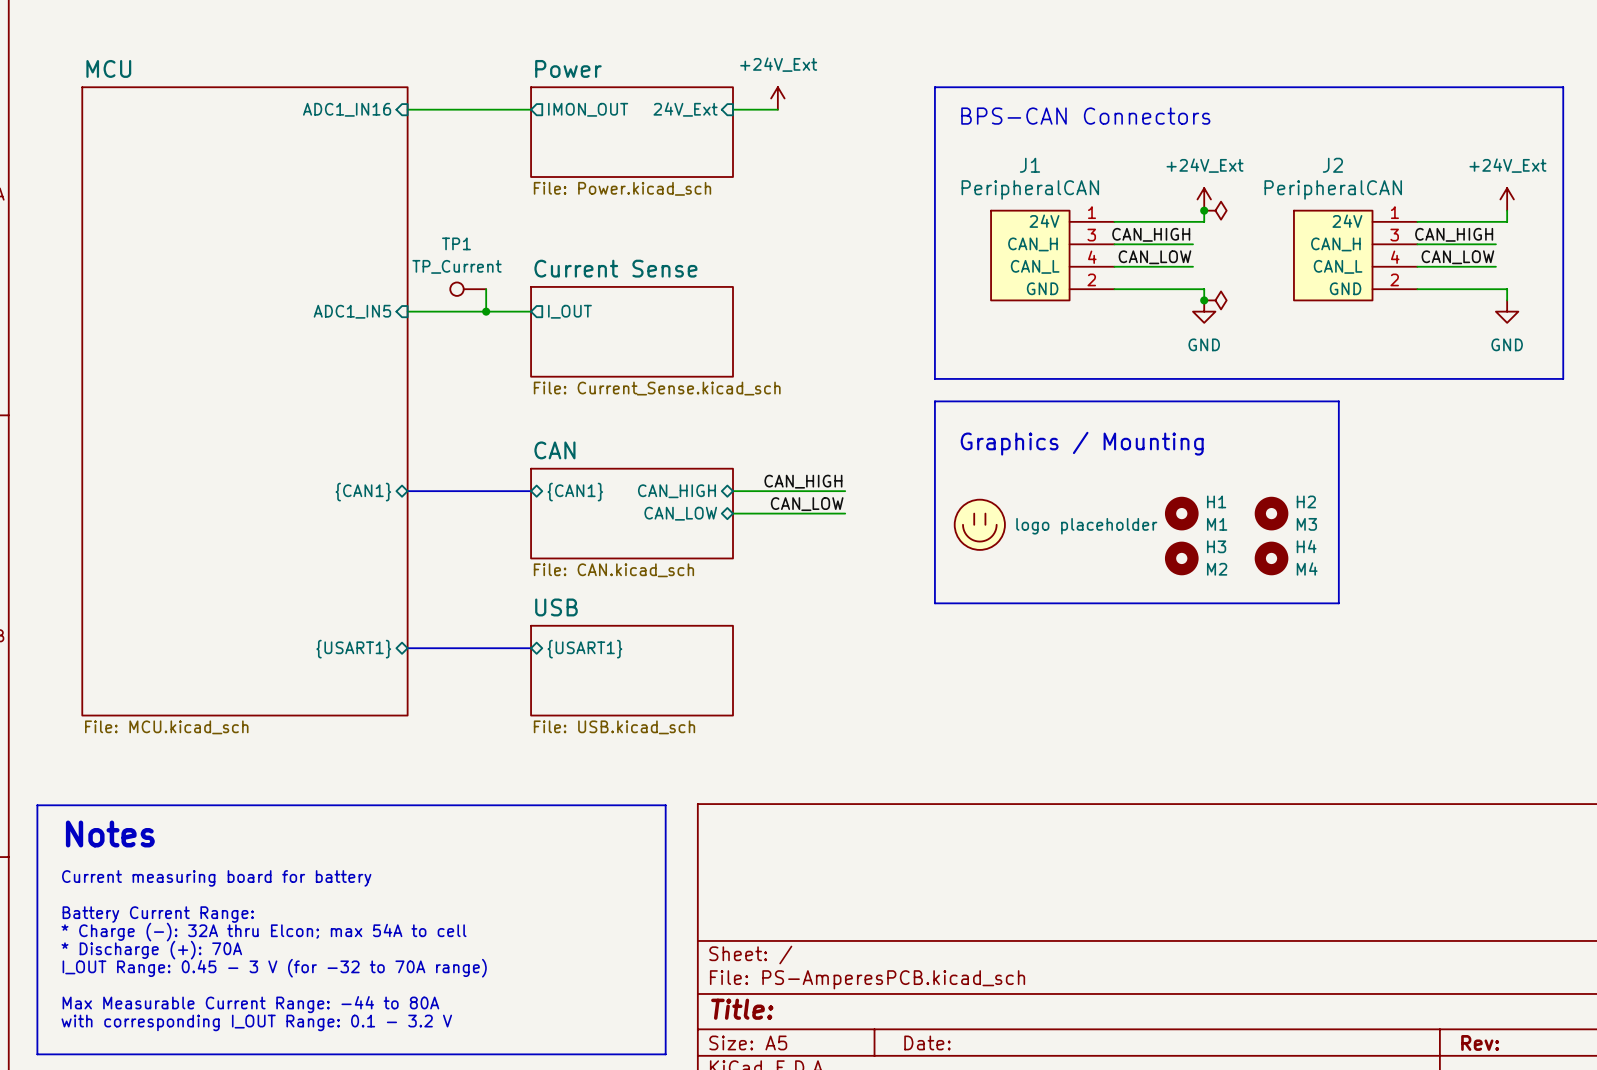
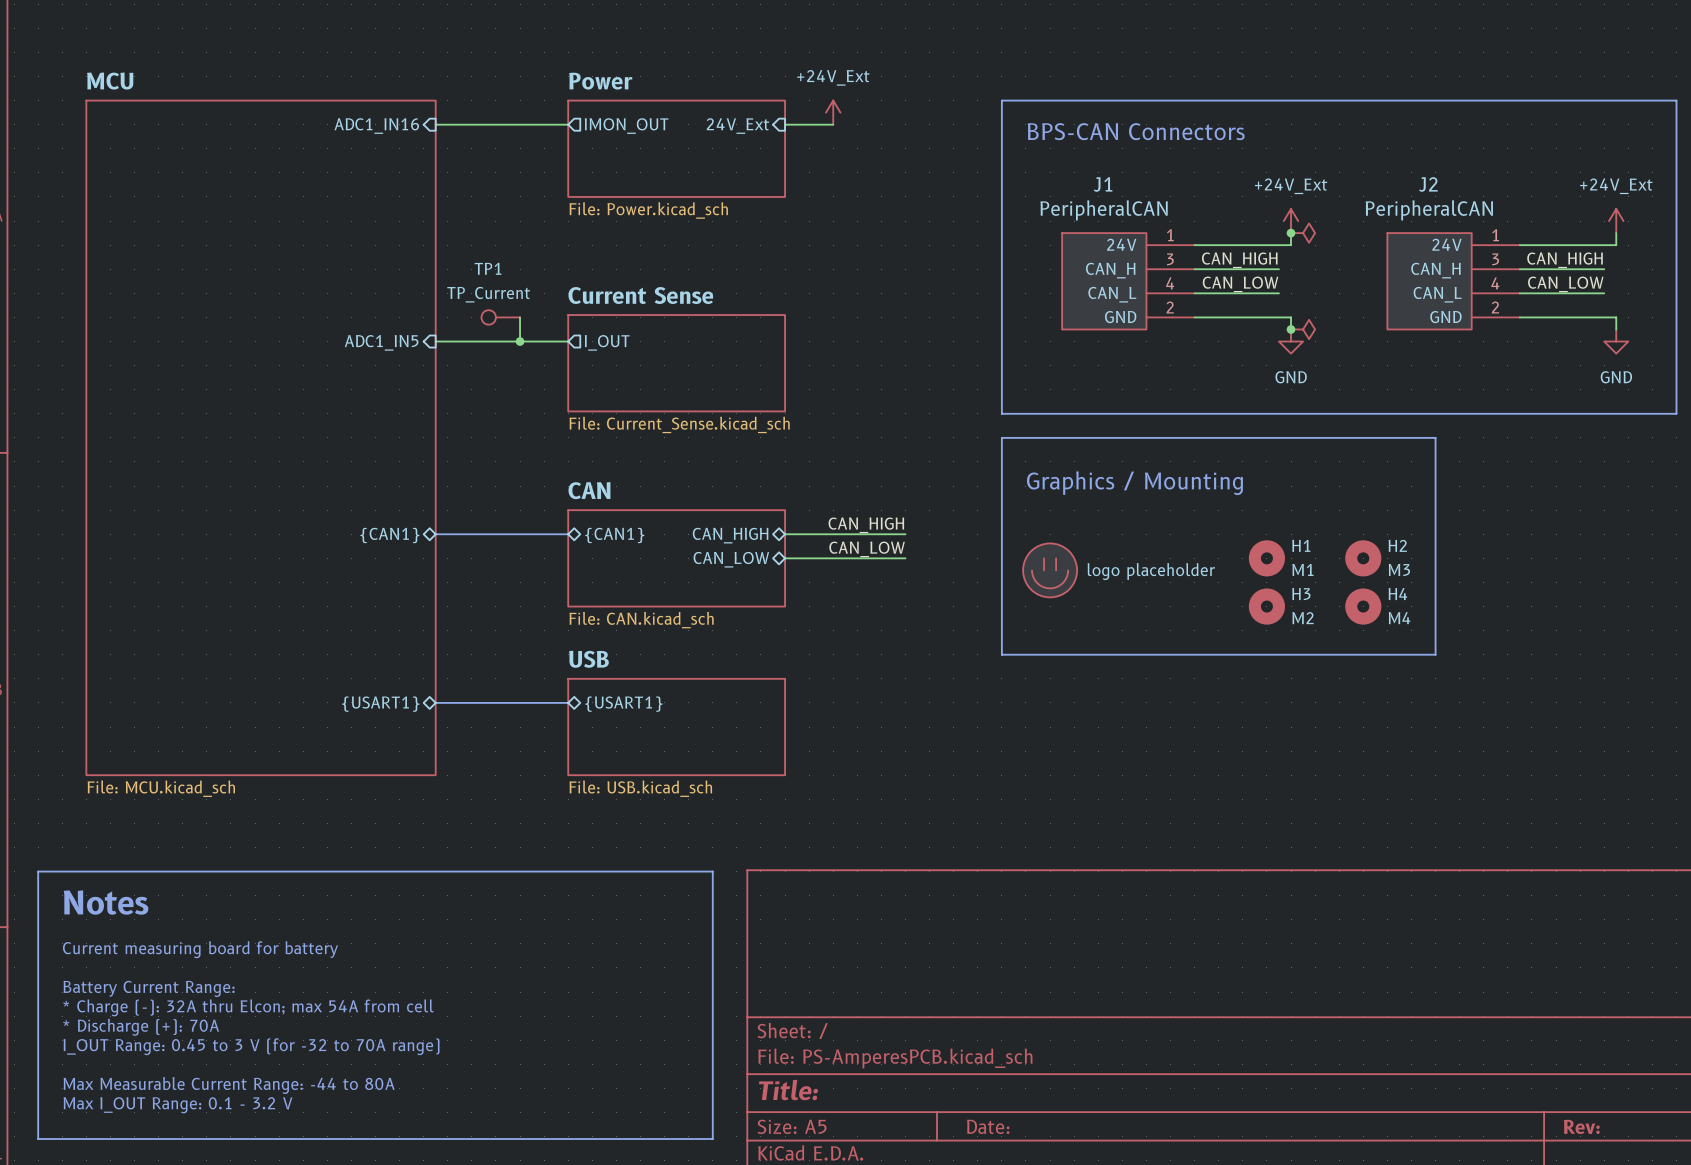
text: * Charge (-): 32A thru Elcon; max 54A to cell (264, 932) -> * Charge (-): 32A thru Elcon; max 54A from cell (248, 1007)
text: I_OUT Range: 0.45 - 3 V (for -32 to 70A range) (274, 968) -> I_OUT Range: 0.45 to 3 V (for -32 to 70A range) (251, 1046)
text: with corresponding I_OUT Range: 0.1 - 3.2 V (256, 1022) -> Max I_OUT Range: 0.1 - 3.2 V (178, 1105)

